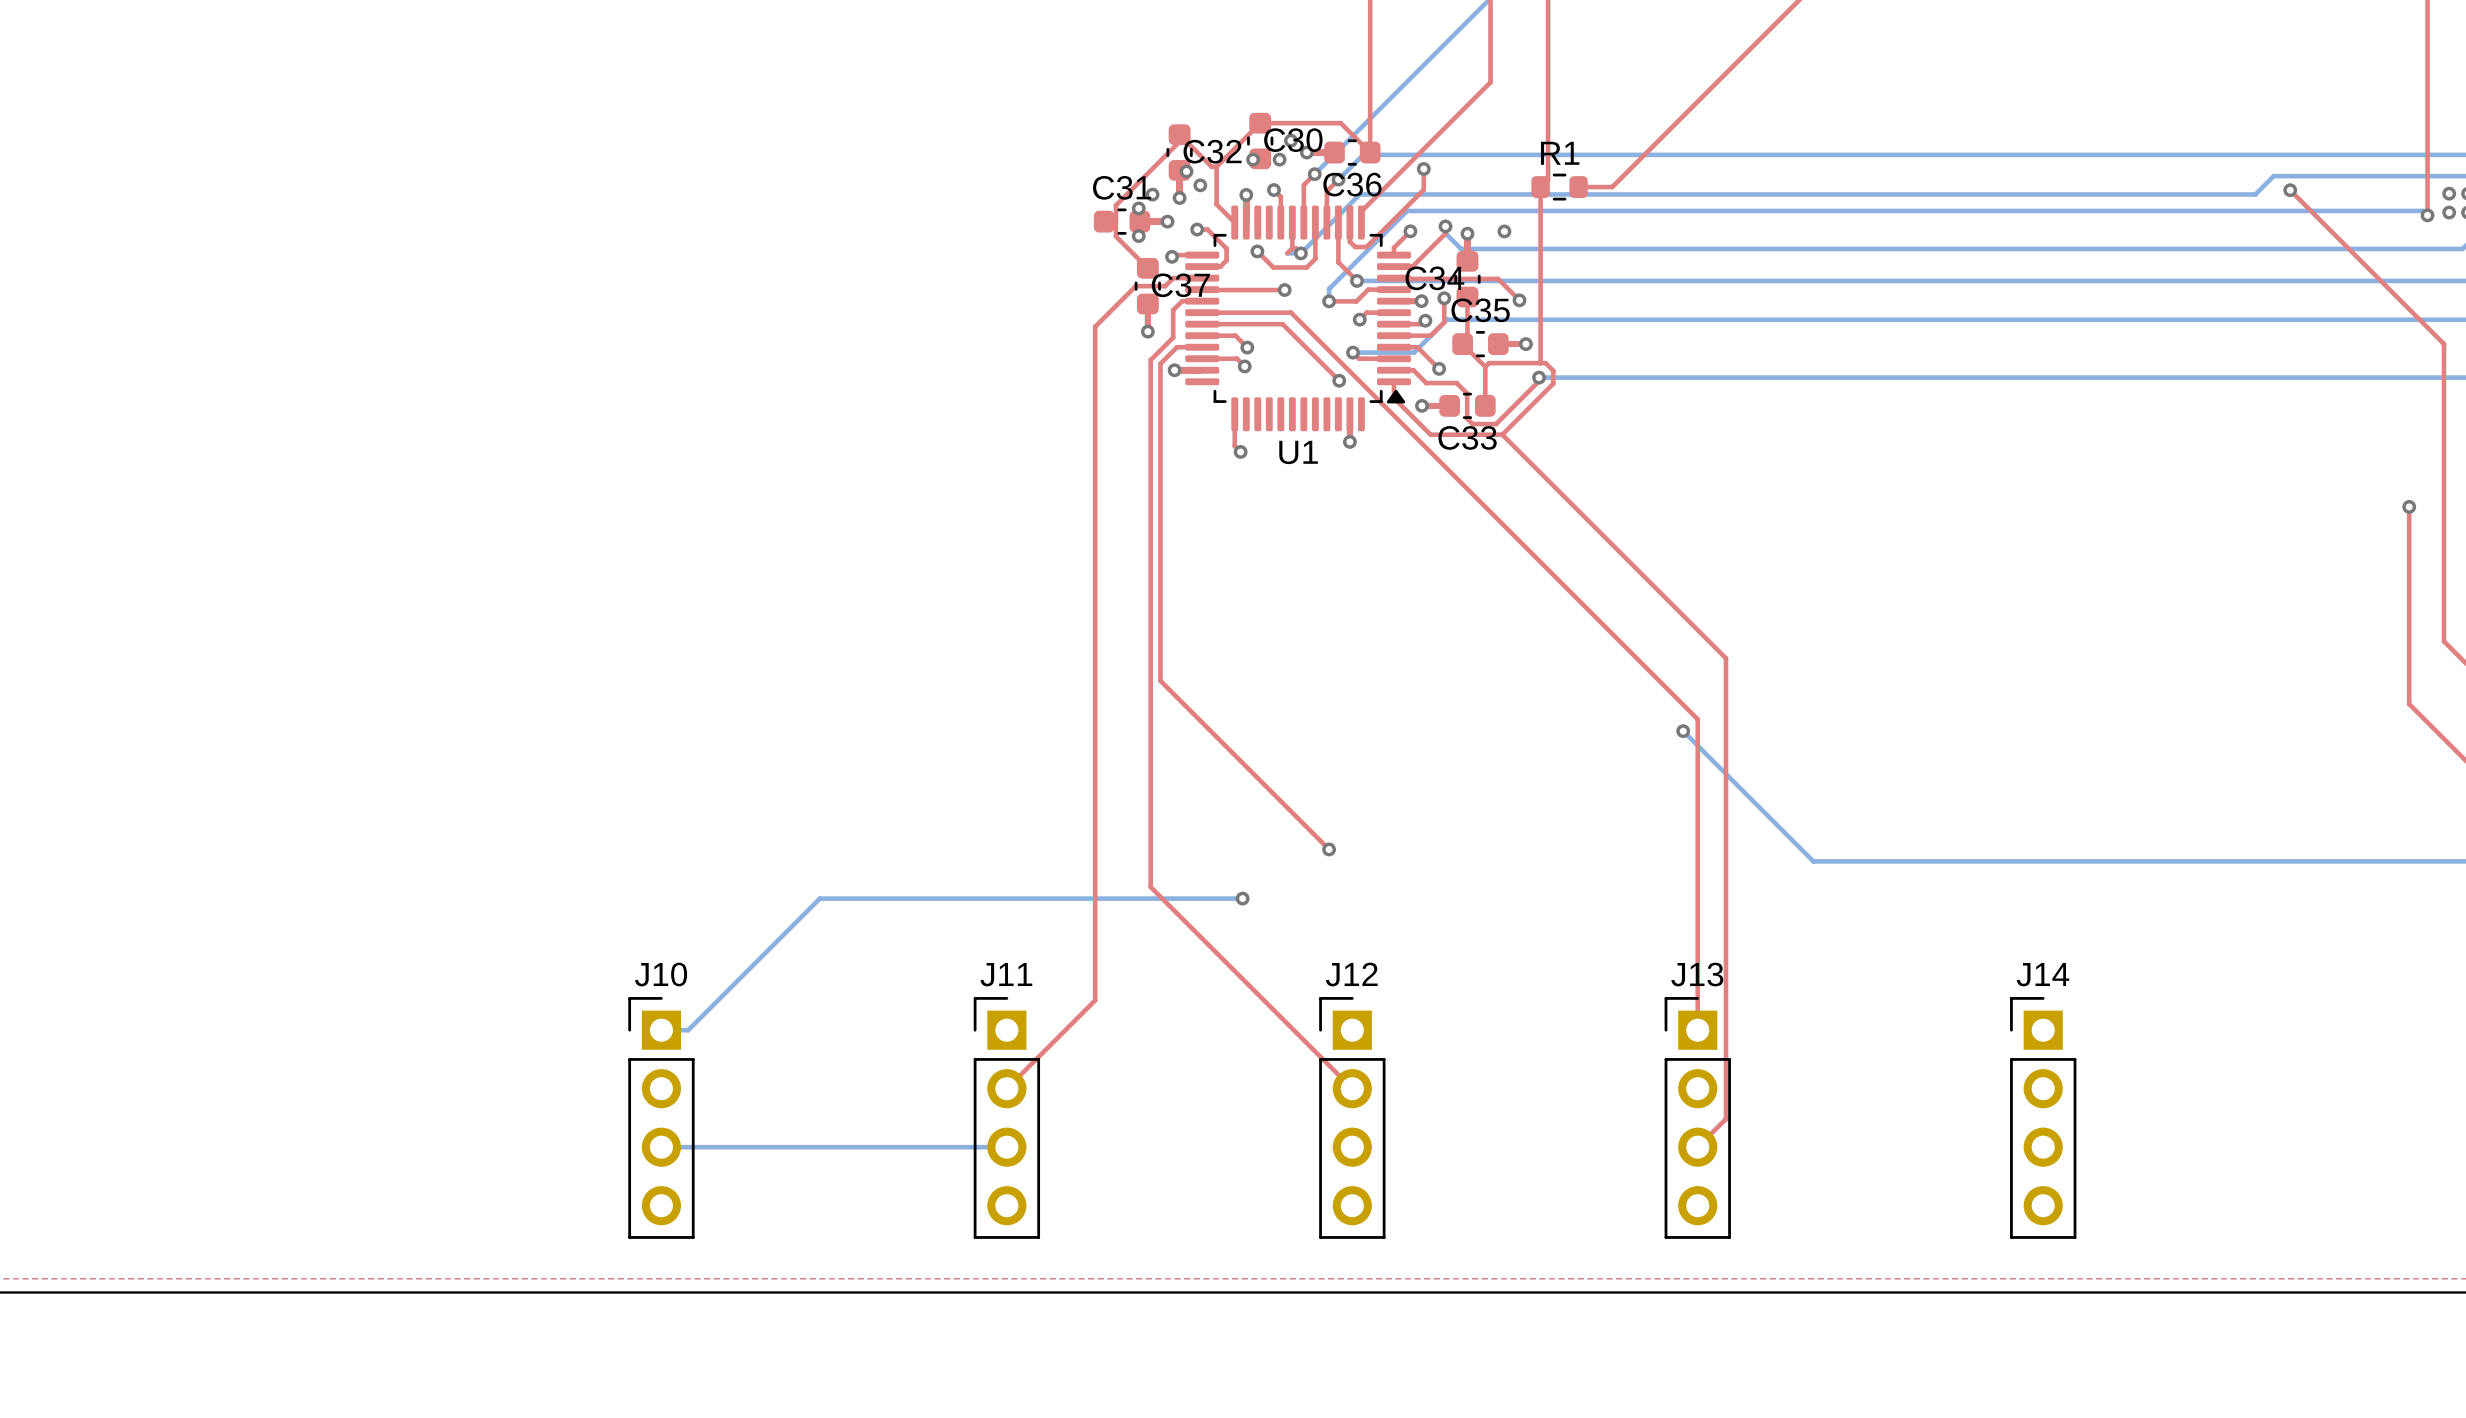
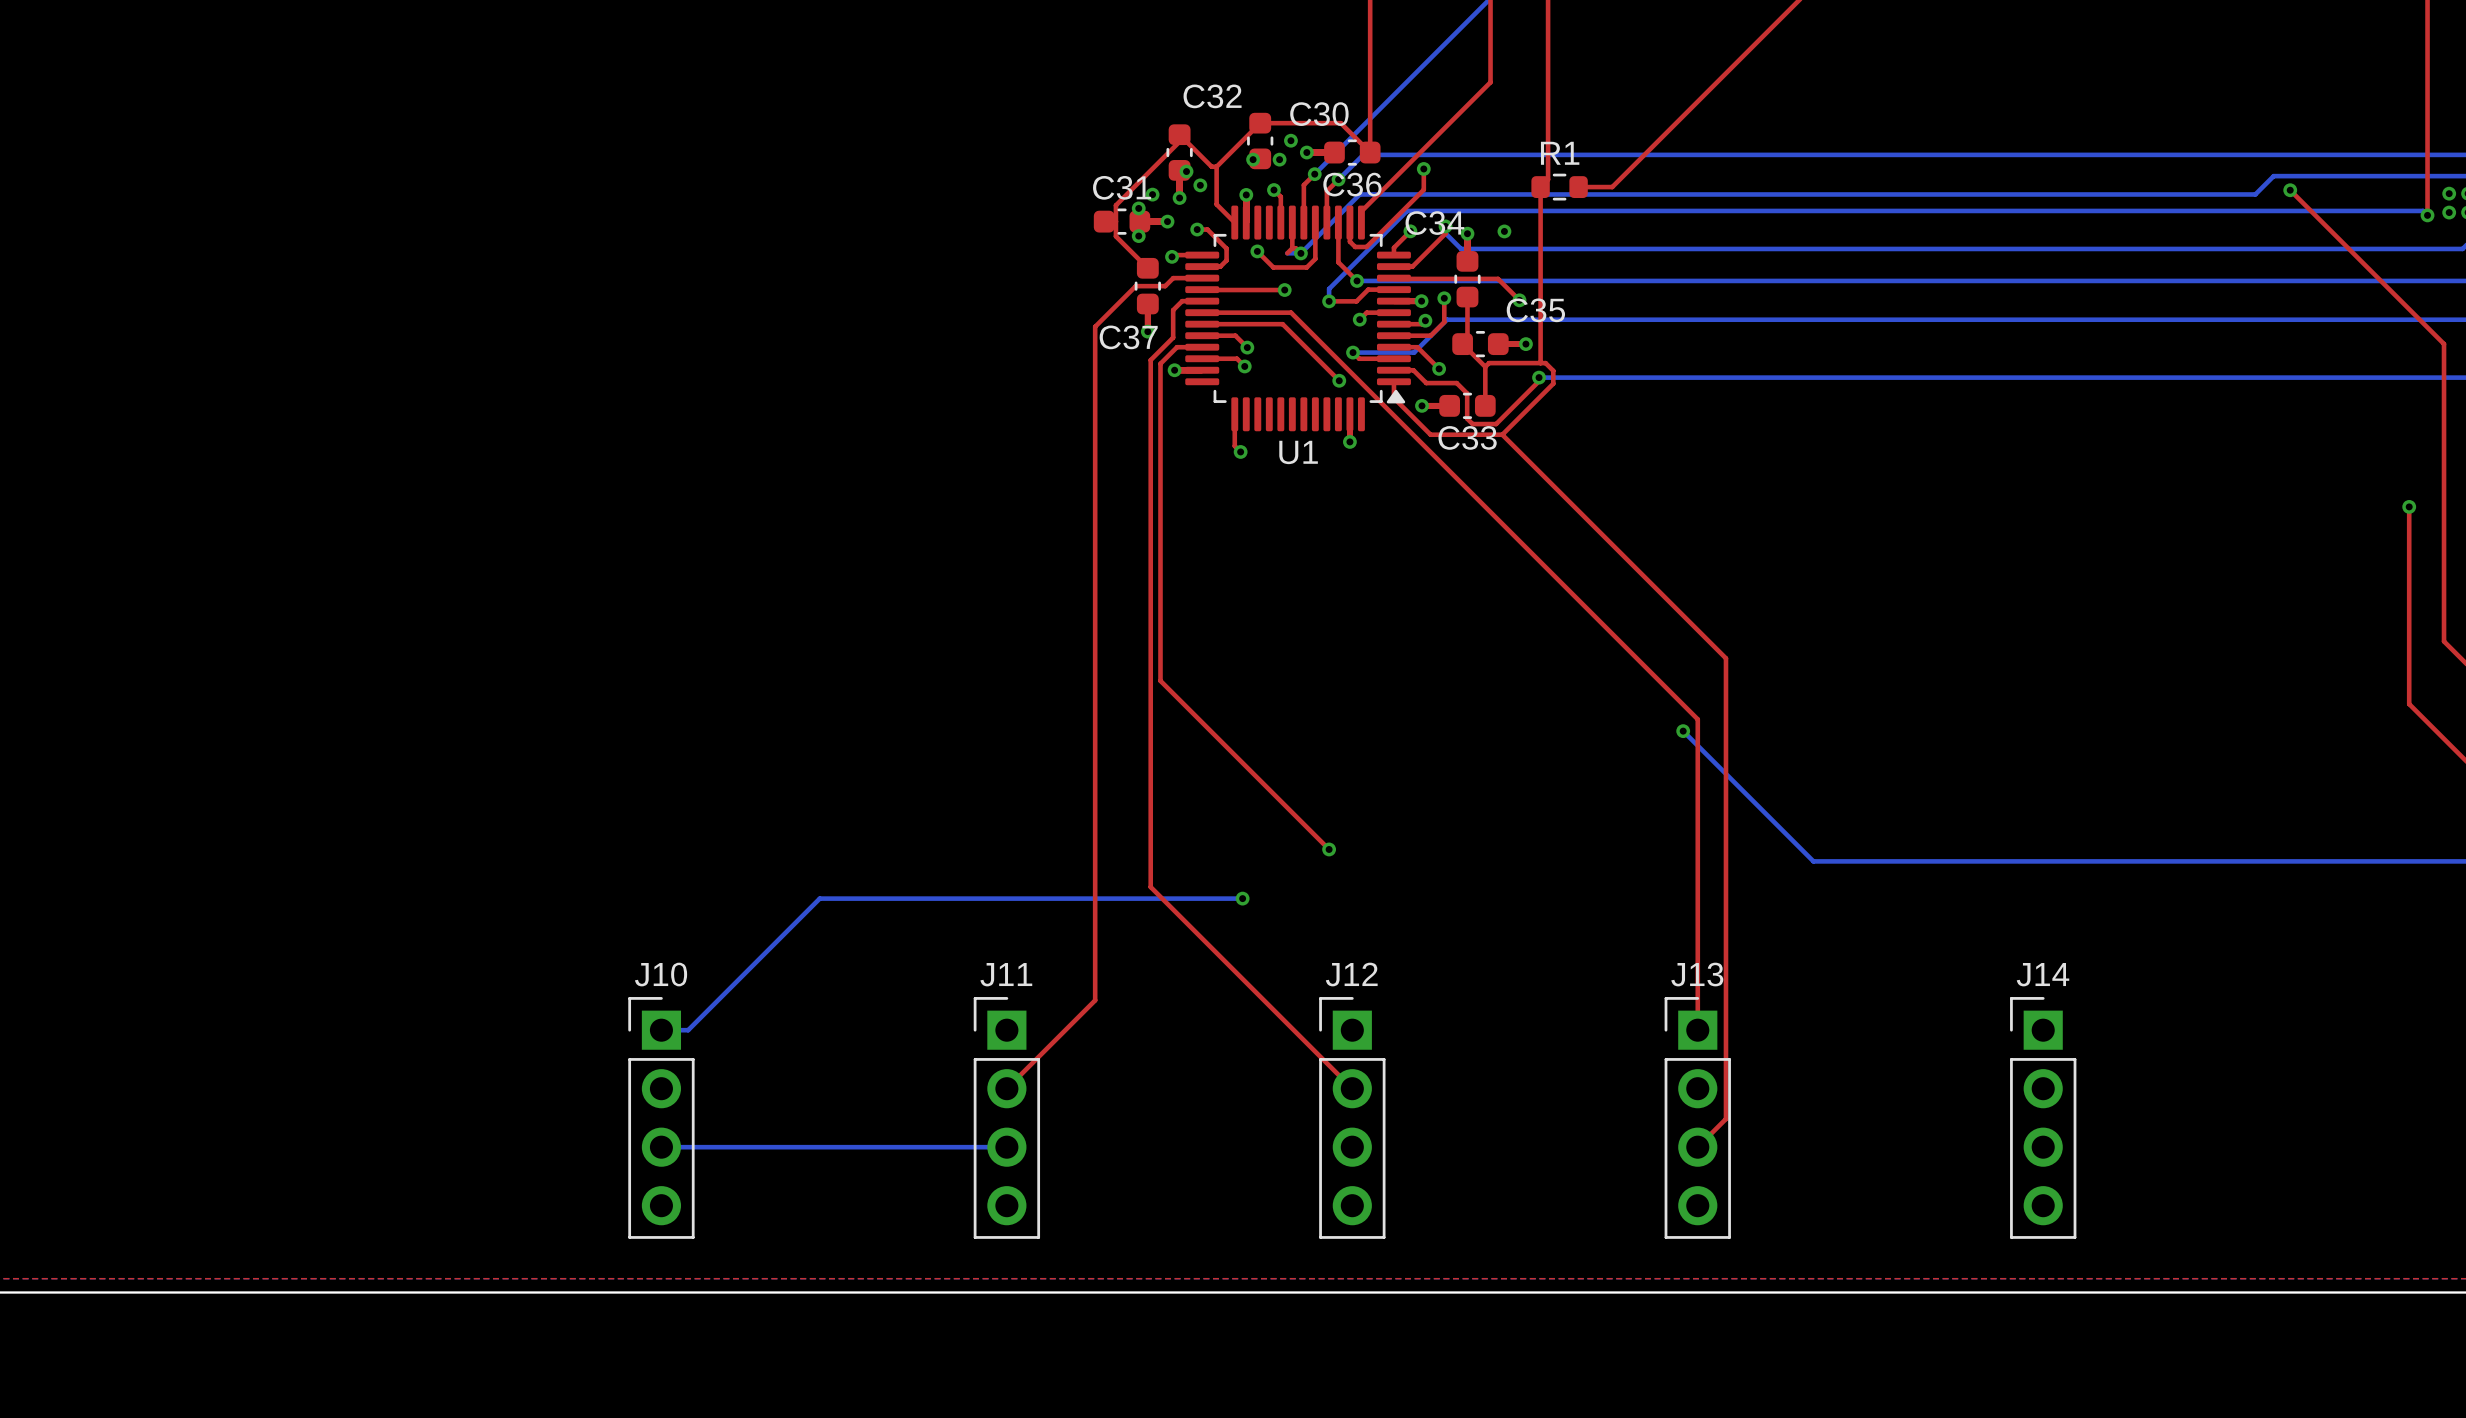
C30 name position: C30 (1293, 140) -> C30 (1319, 114)
C32 name position: C32 (1212, 151) -> C32 (1212, 96)
C34 name position: C34 (1434, 278) -> C34 (1434, 223)
C37 name position: C37 (1180, 285) -> C37 (1128, 337)
C35 name position: C35 (1480, 310) -> C35 (1535, 310)

